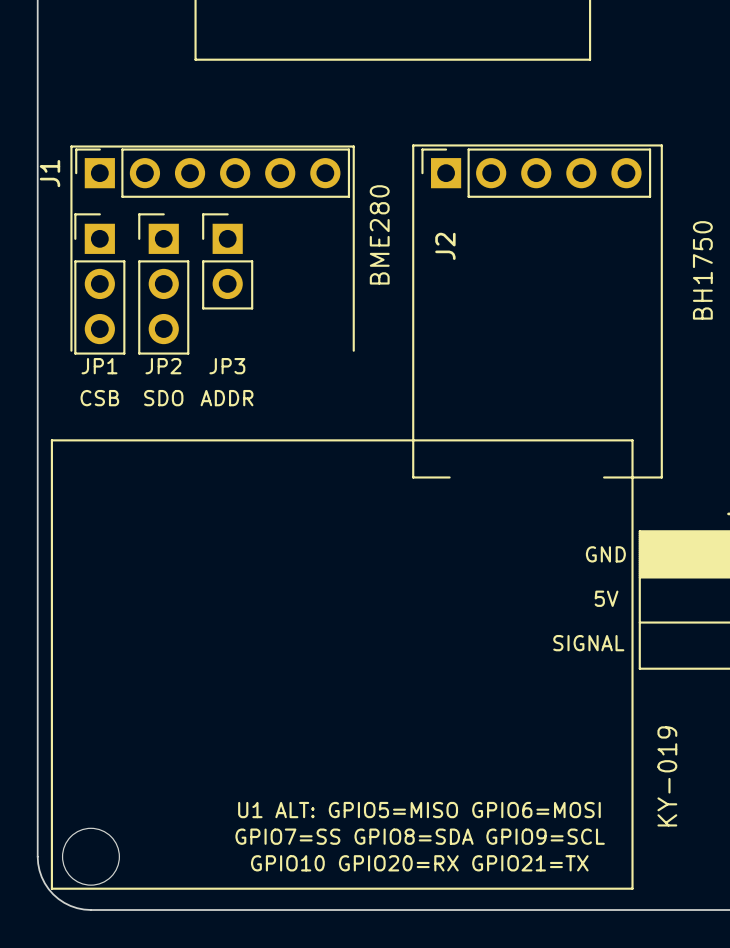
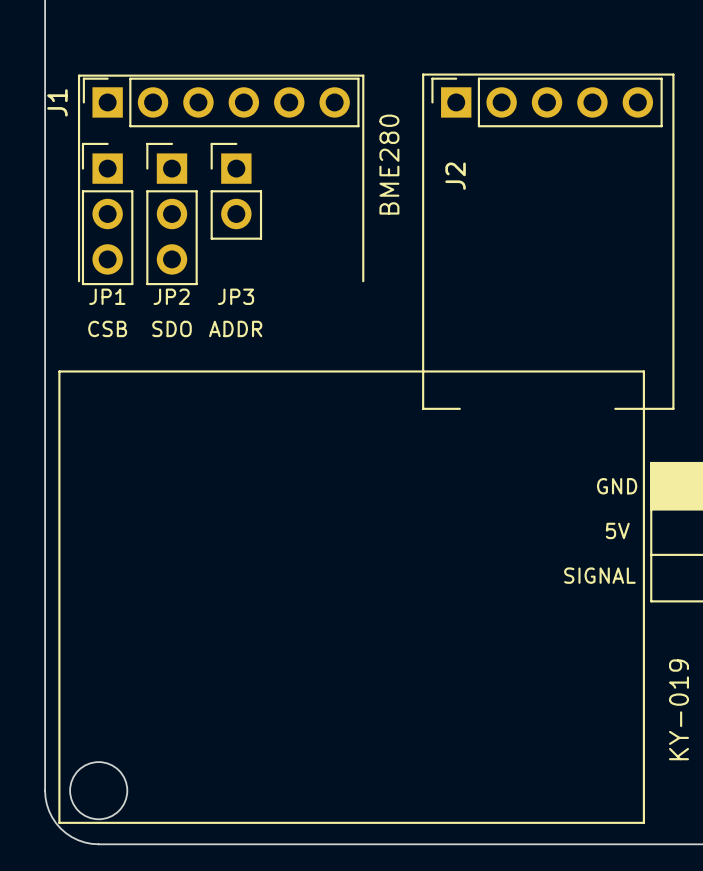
text: U1 ALT: GPIO5=MISO GPIO6=MOSI (419, 810) -> none
text: GPIO7=SS GPIO8=SDA GPIO9=SCL (420, 836) -> none
text: GPIO10 GPIO20=RX GPIO21=TX (419, 863) -> none

